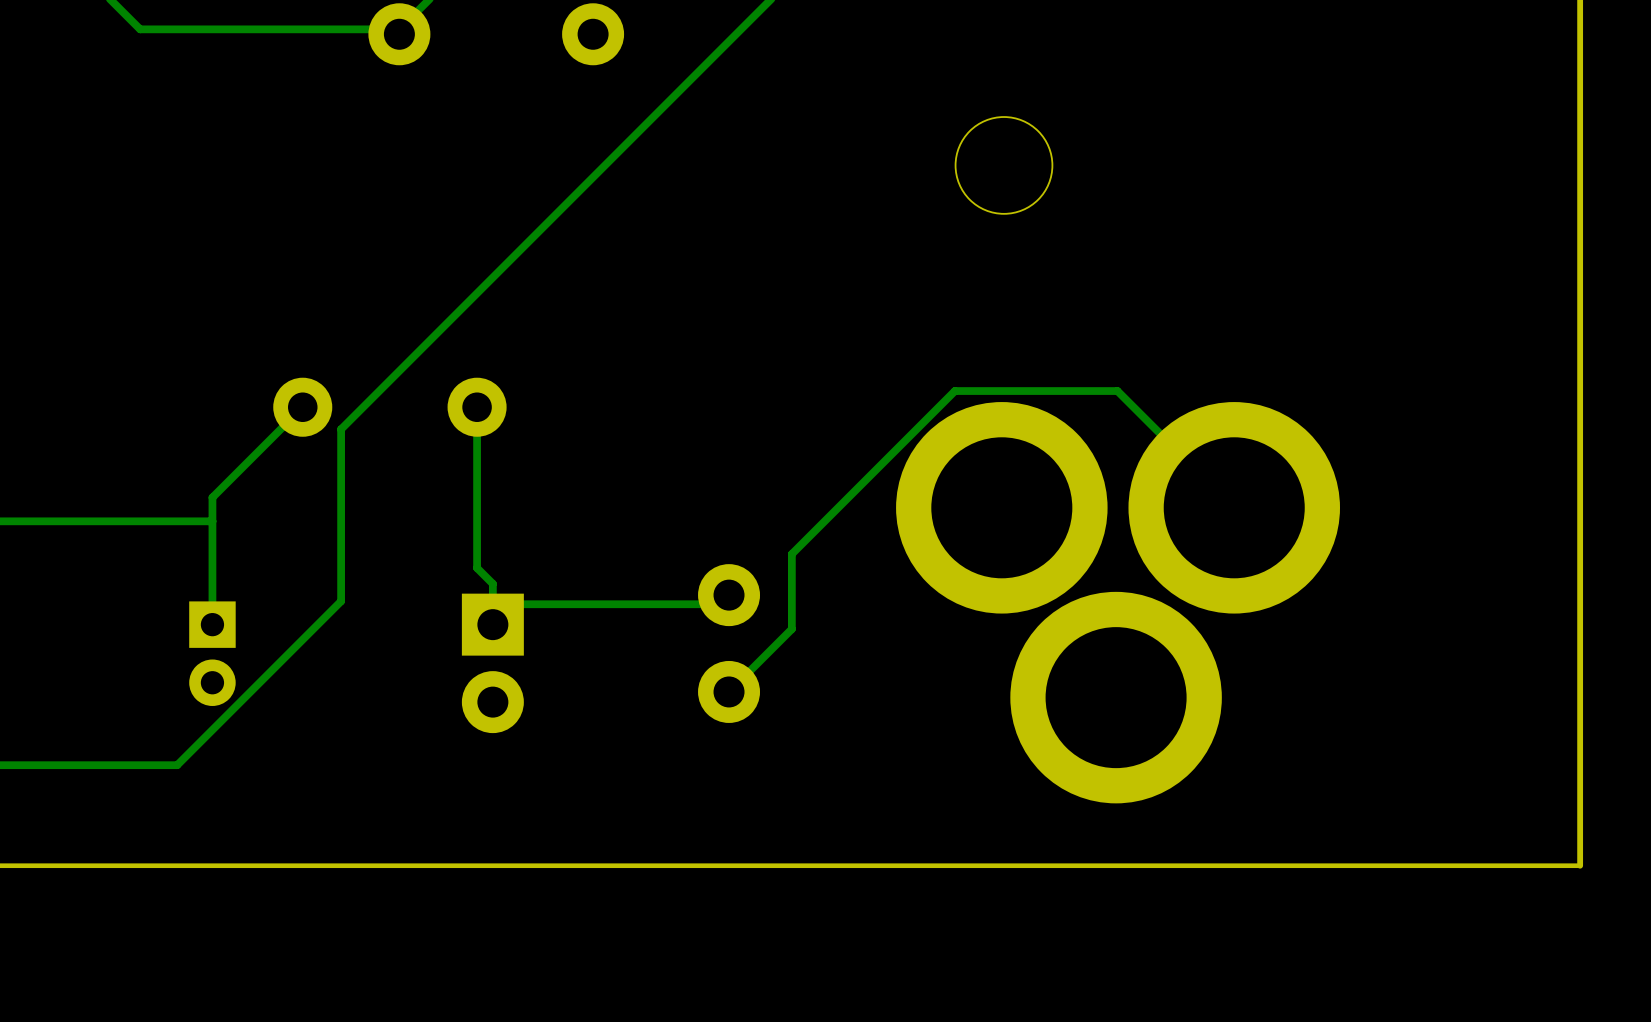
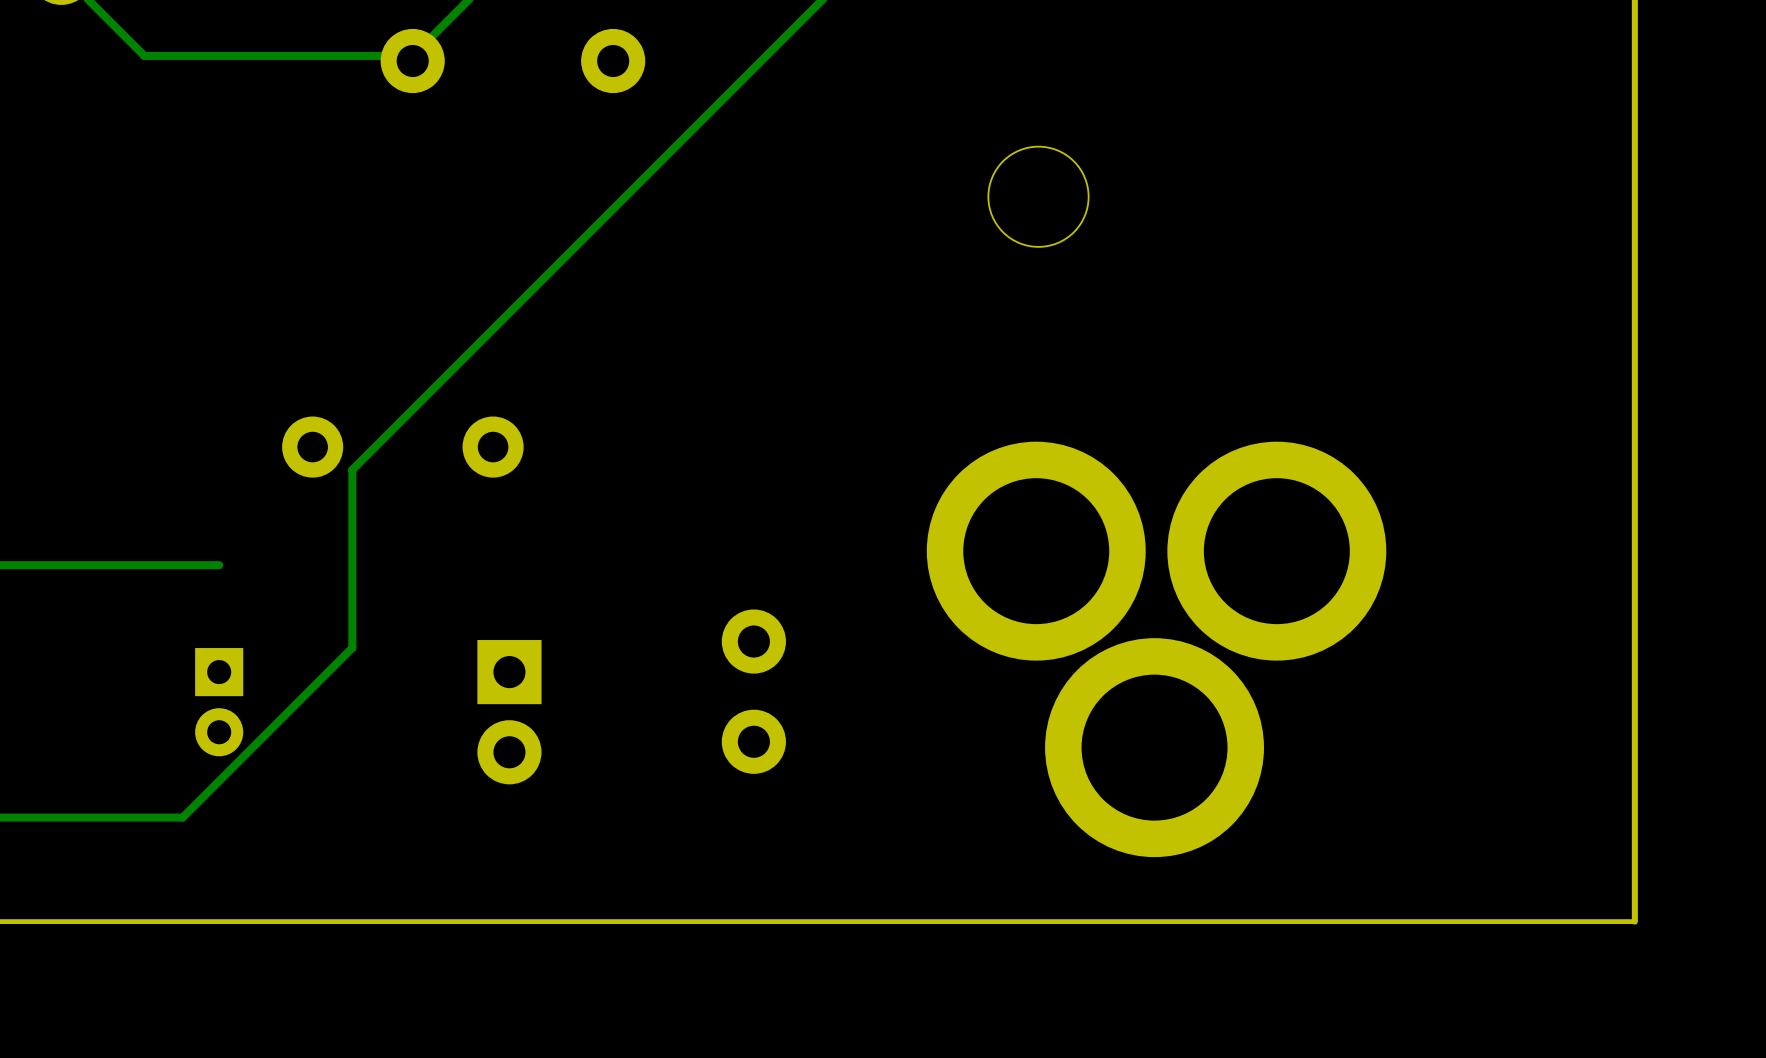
track: (302, 407) (212, 497) (212, 624) -> none
track: (477, 407) (477, 568) (492, 583) (492, 624) -> none
track: (1234, 507) (1117, 391) (954, 391) (791, 554) (791, 629) (729, 691) -> none
track: (729, 595) (719, 604) (492, 604) -> none

